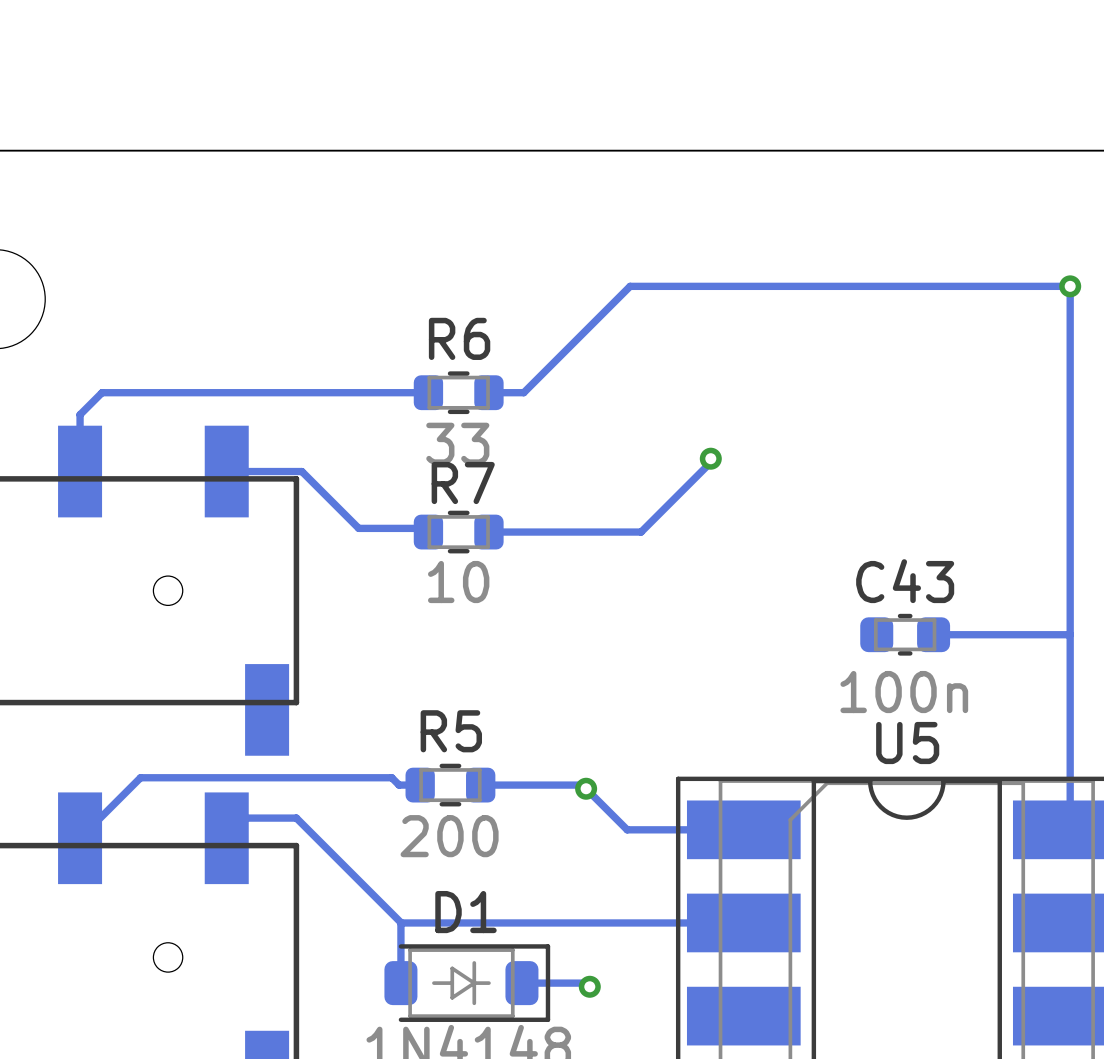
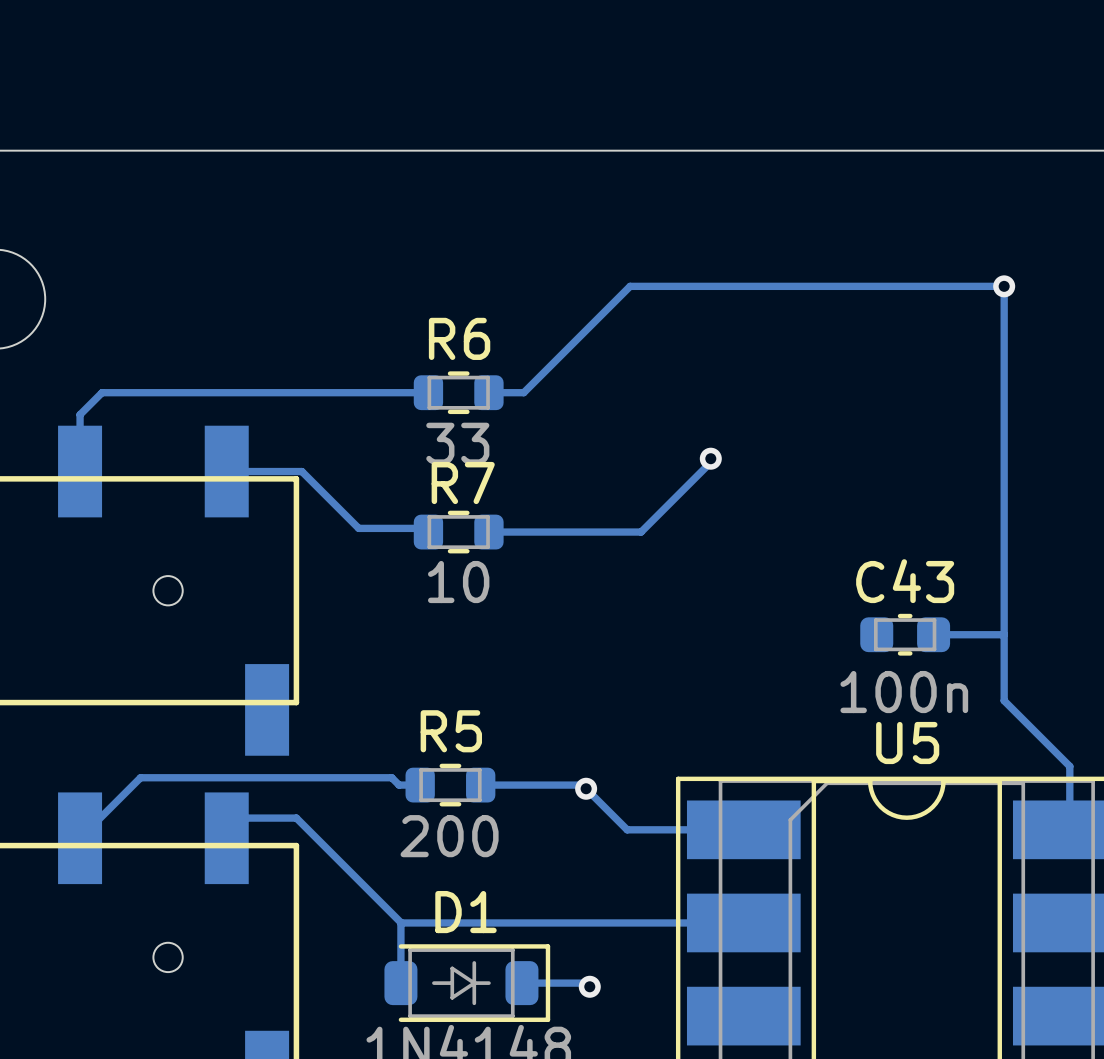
track: (1004, 286) (1070, 286) (1070, 829) -> (1004, 286) (1004, 700) (1069, 766) (1069, 829)
via: none -> (1004, 286)
via: (1070, 286) -> none
track: (1070, 634) (1004, 634) -> none

